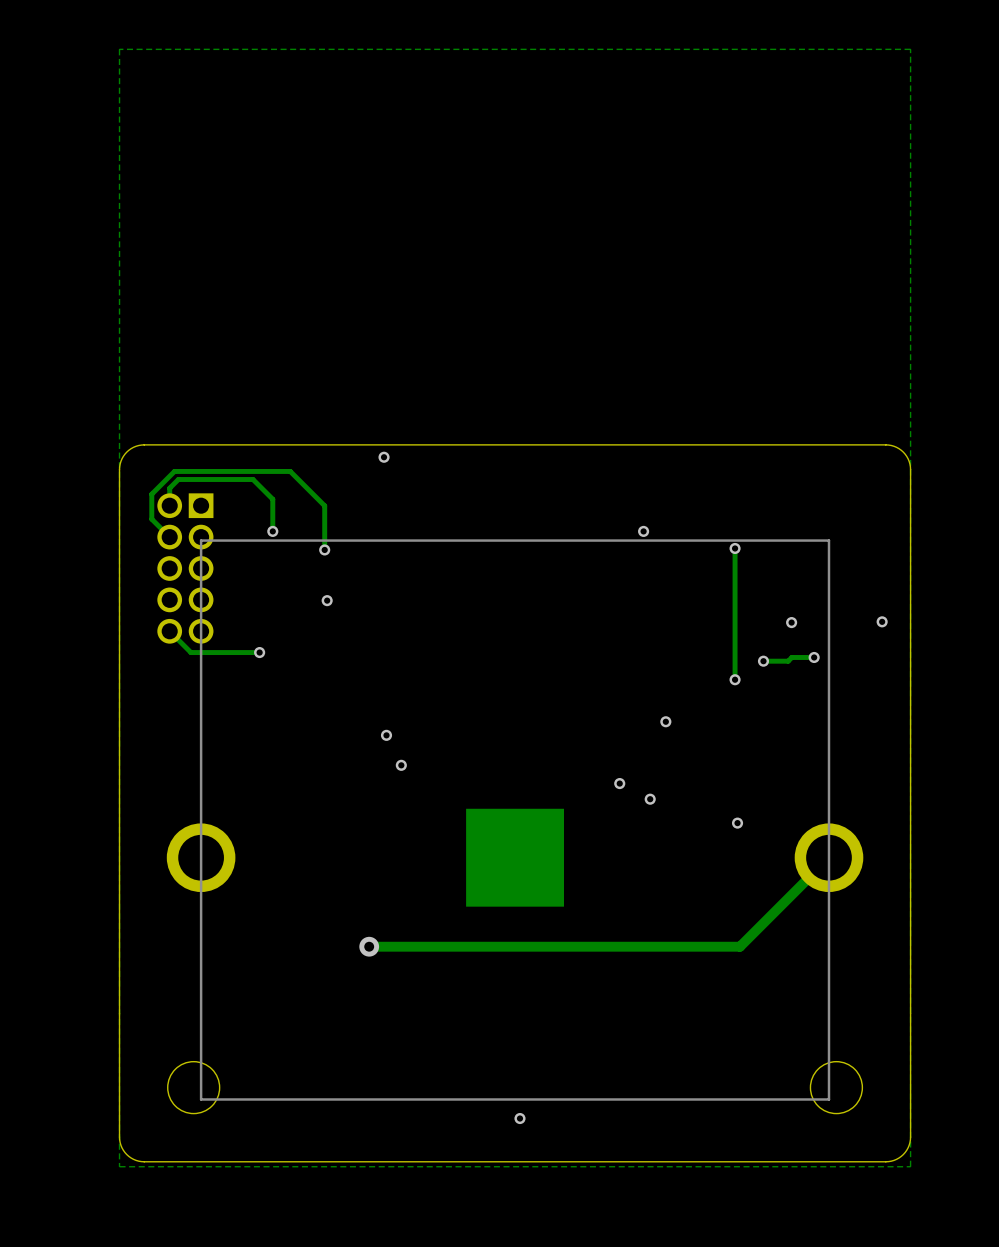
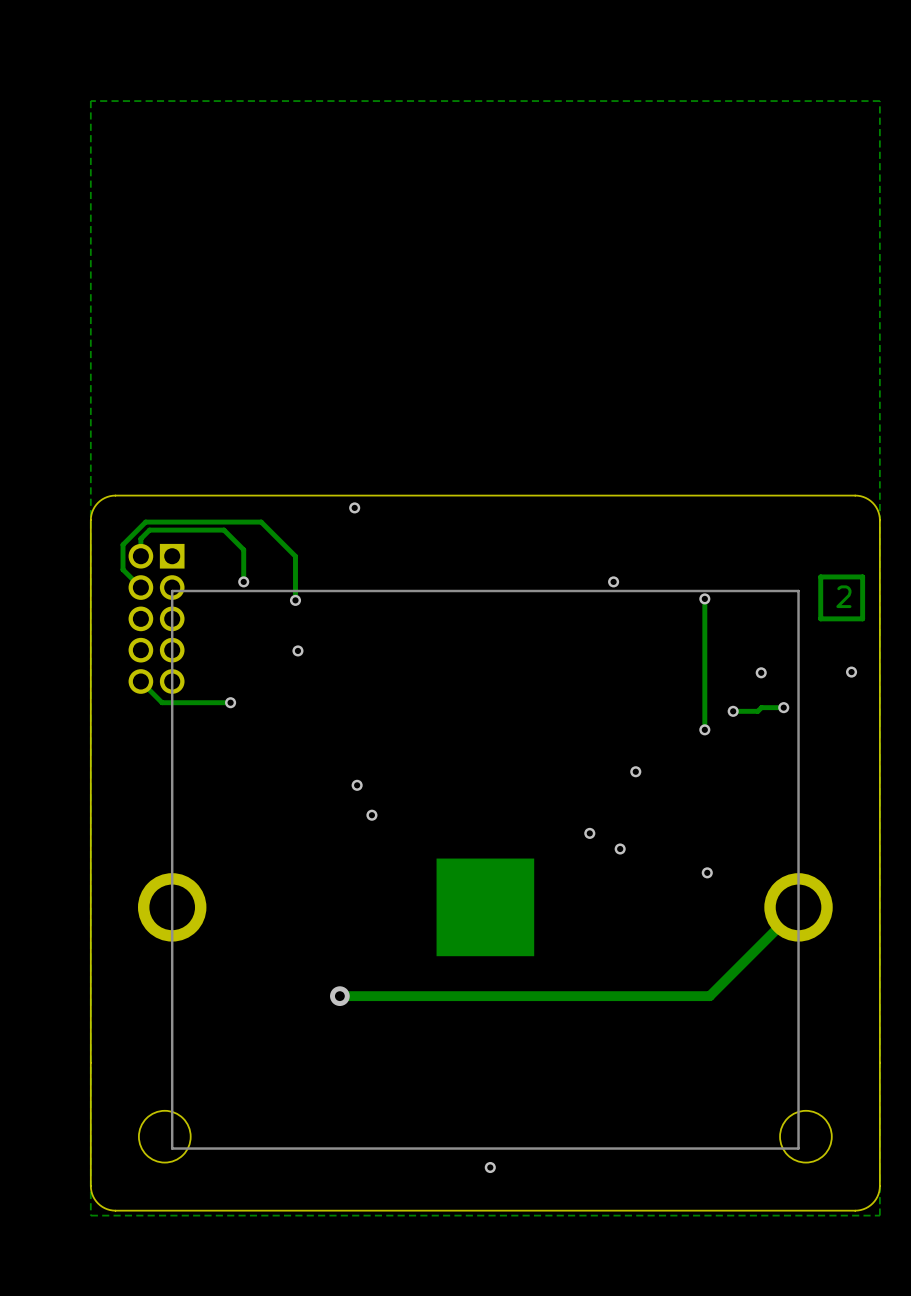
track: none -> (862, 576) (820, 576) (820, 618) (862, 618) (862, 576)
text: none -> 2 (843, 596)

